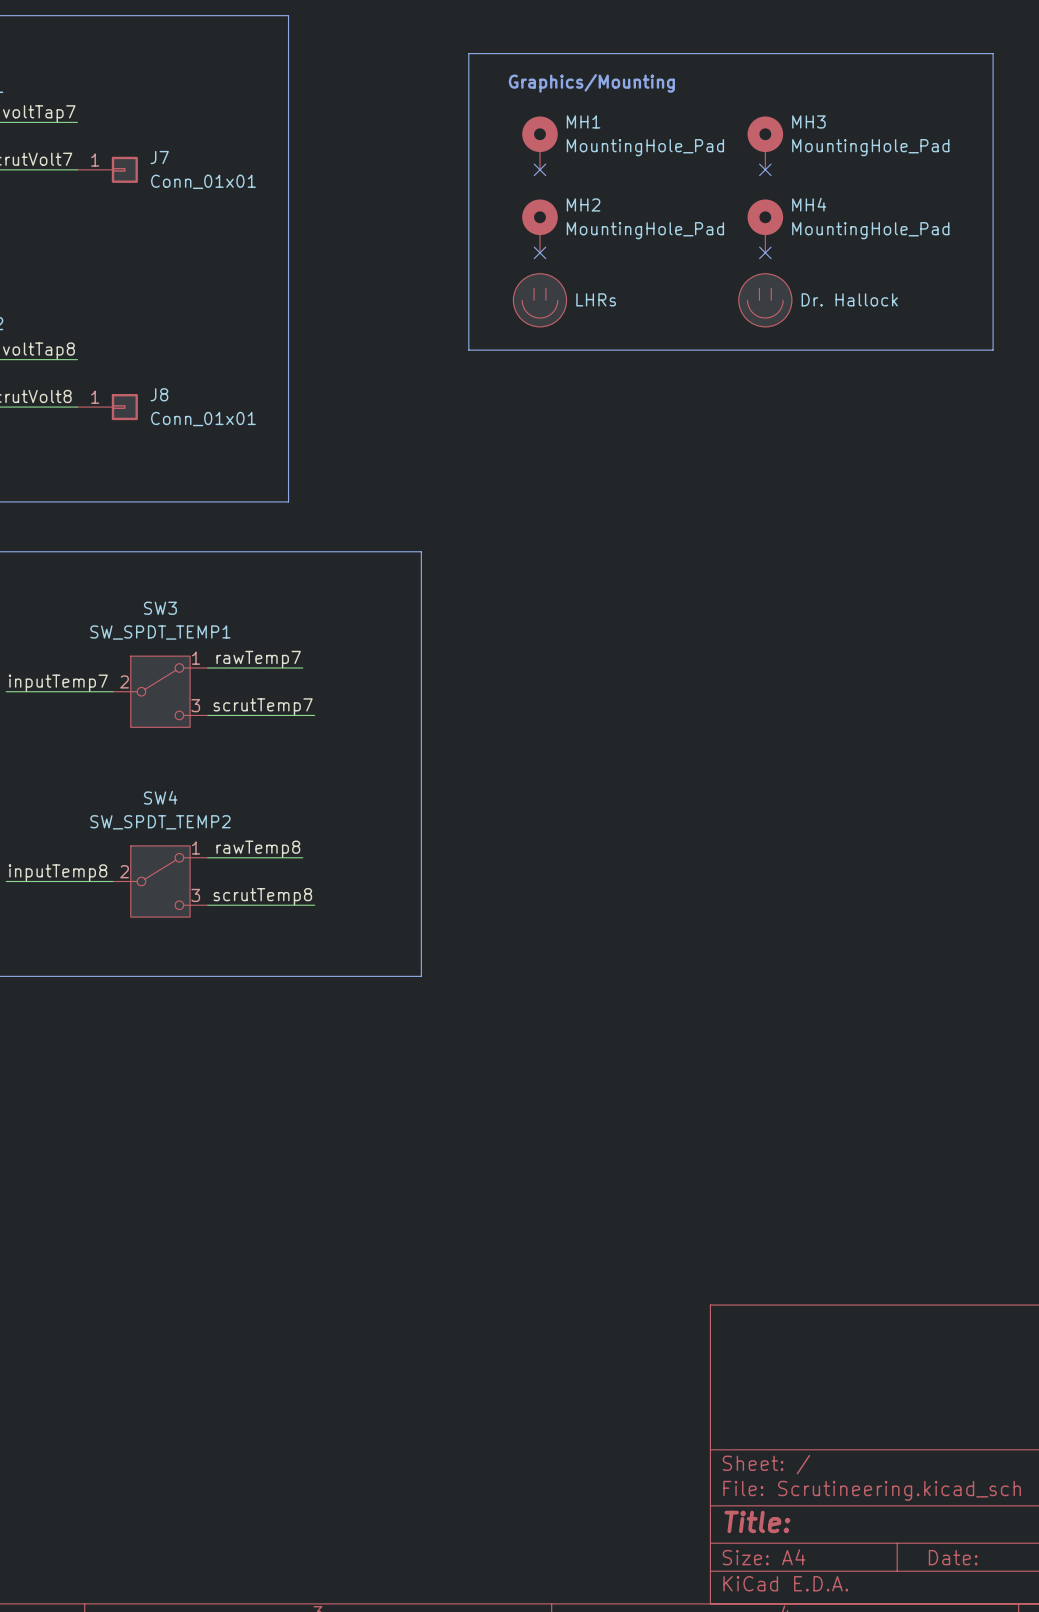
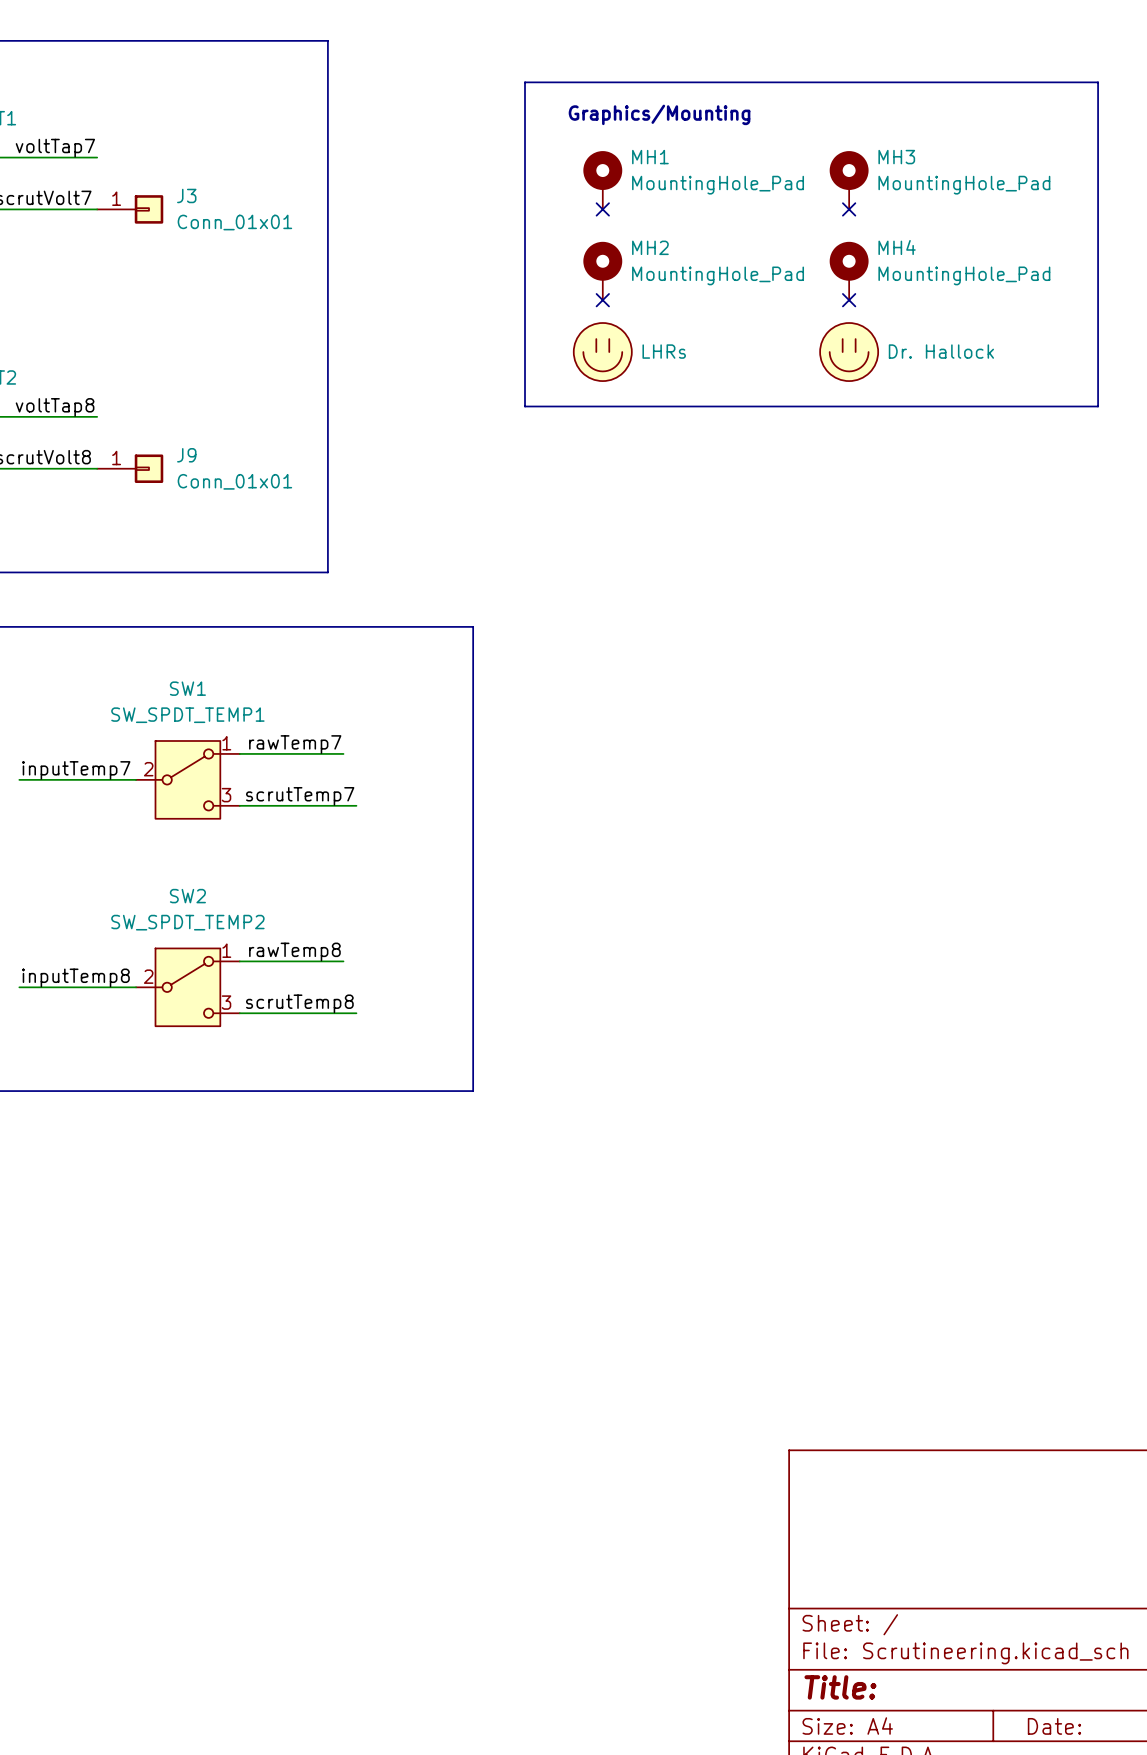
J7 name: J7 (159, 157) -> J3 (186, 195)
J8 name: J8 (159, 394) -> J9 (186, 455)
SW3 name: SW3 (160, 608) -> SW1 (187, 688)
SW4 name: SW4 (160, 797) -> SW2 (187, 896)

